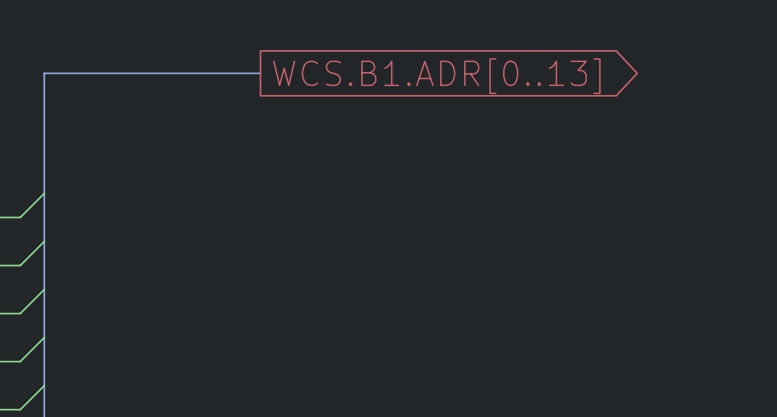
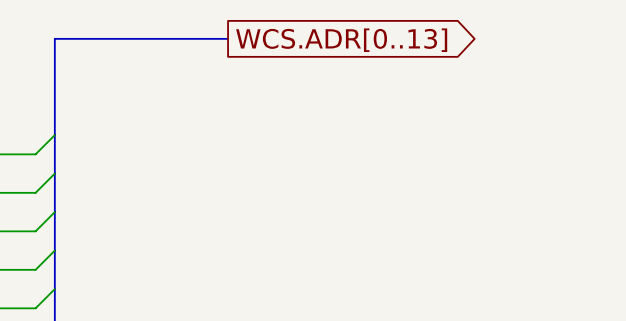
global label: WCS.B1.ADR[0..13] (436, 76) -> WCS.ADR[0..13] (341, 40)

